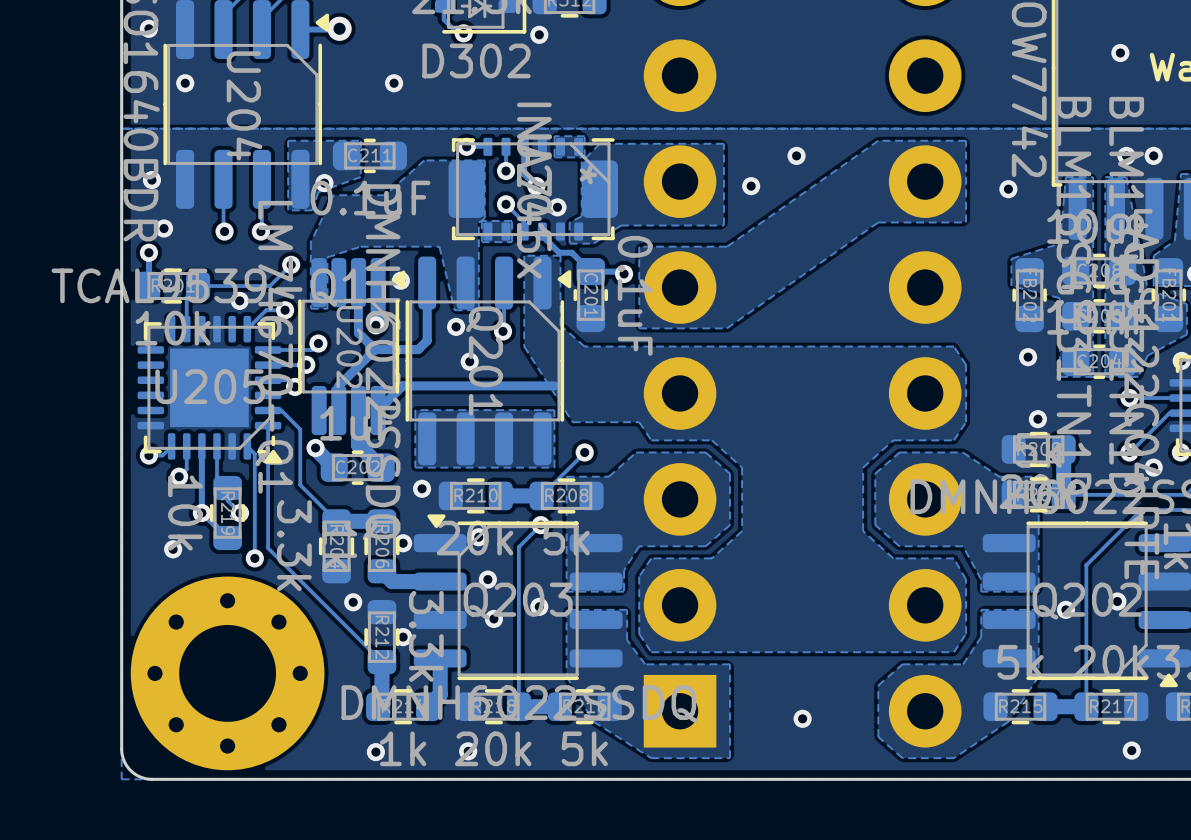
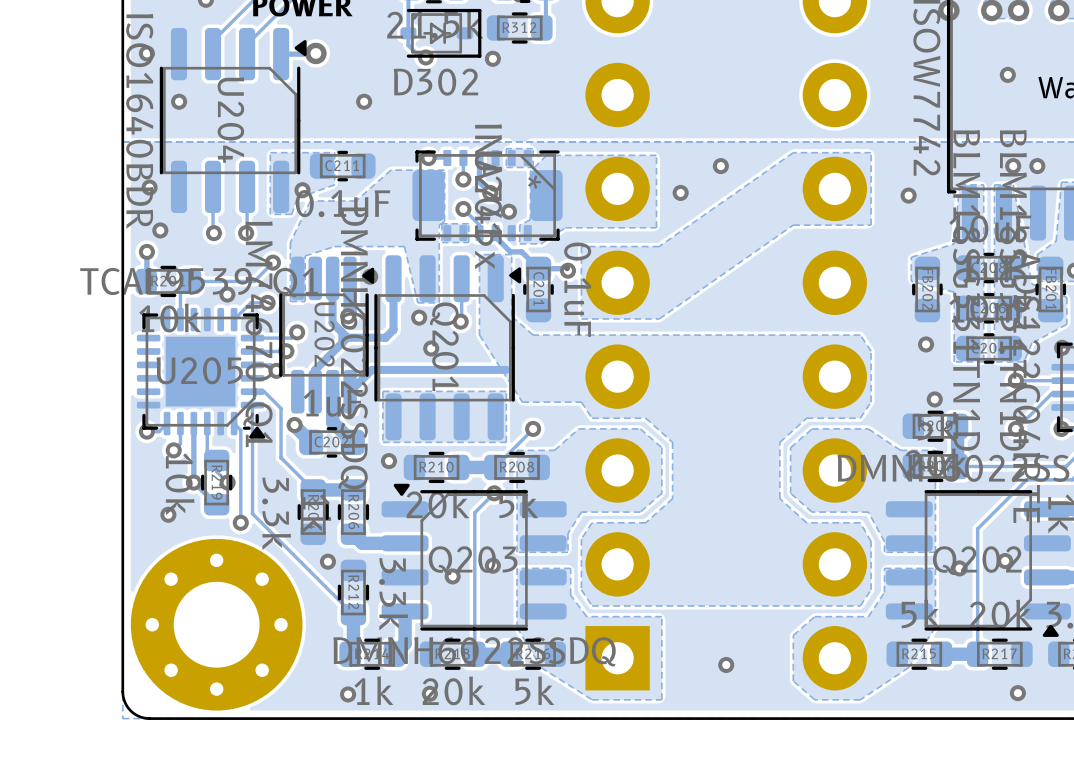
via: (1153, 467) -> none
via: (478, 537) -> none
via: (403, 543) -> none
via: (487, 579) -> none
via: (403, 637) -> none

